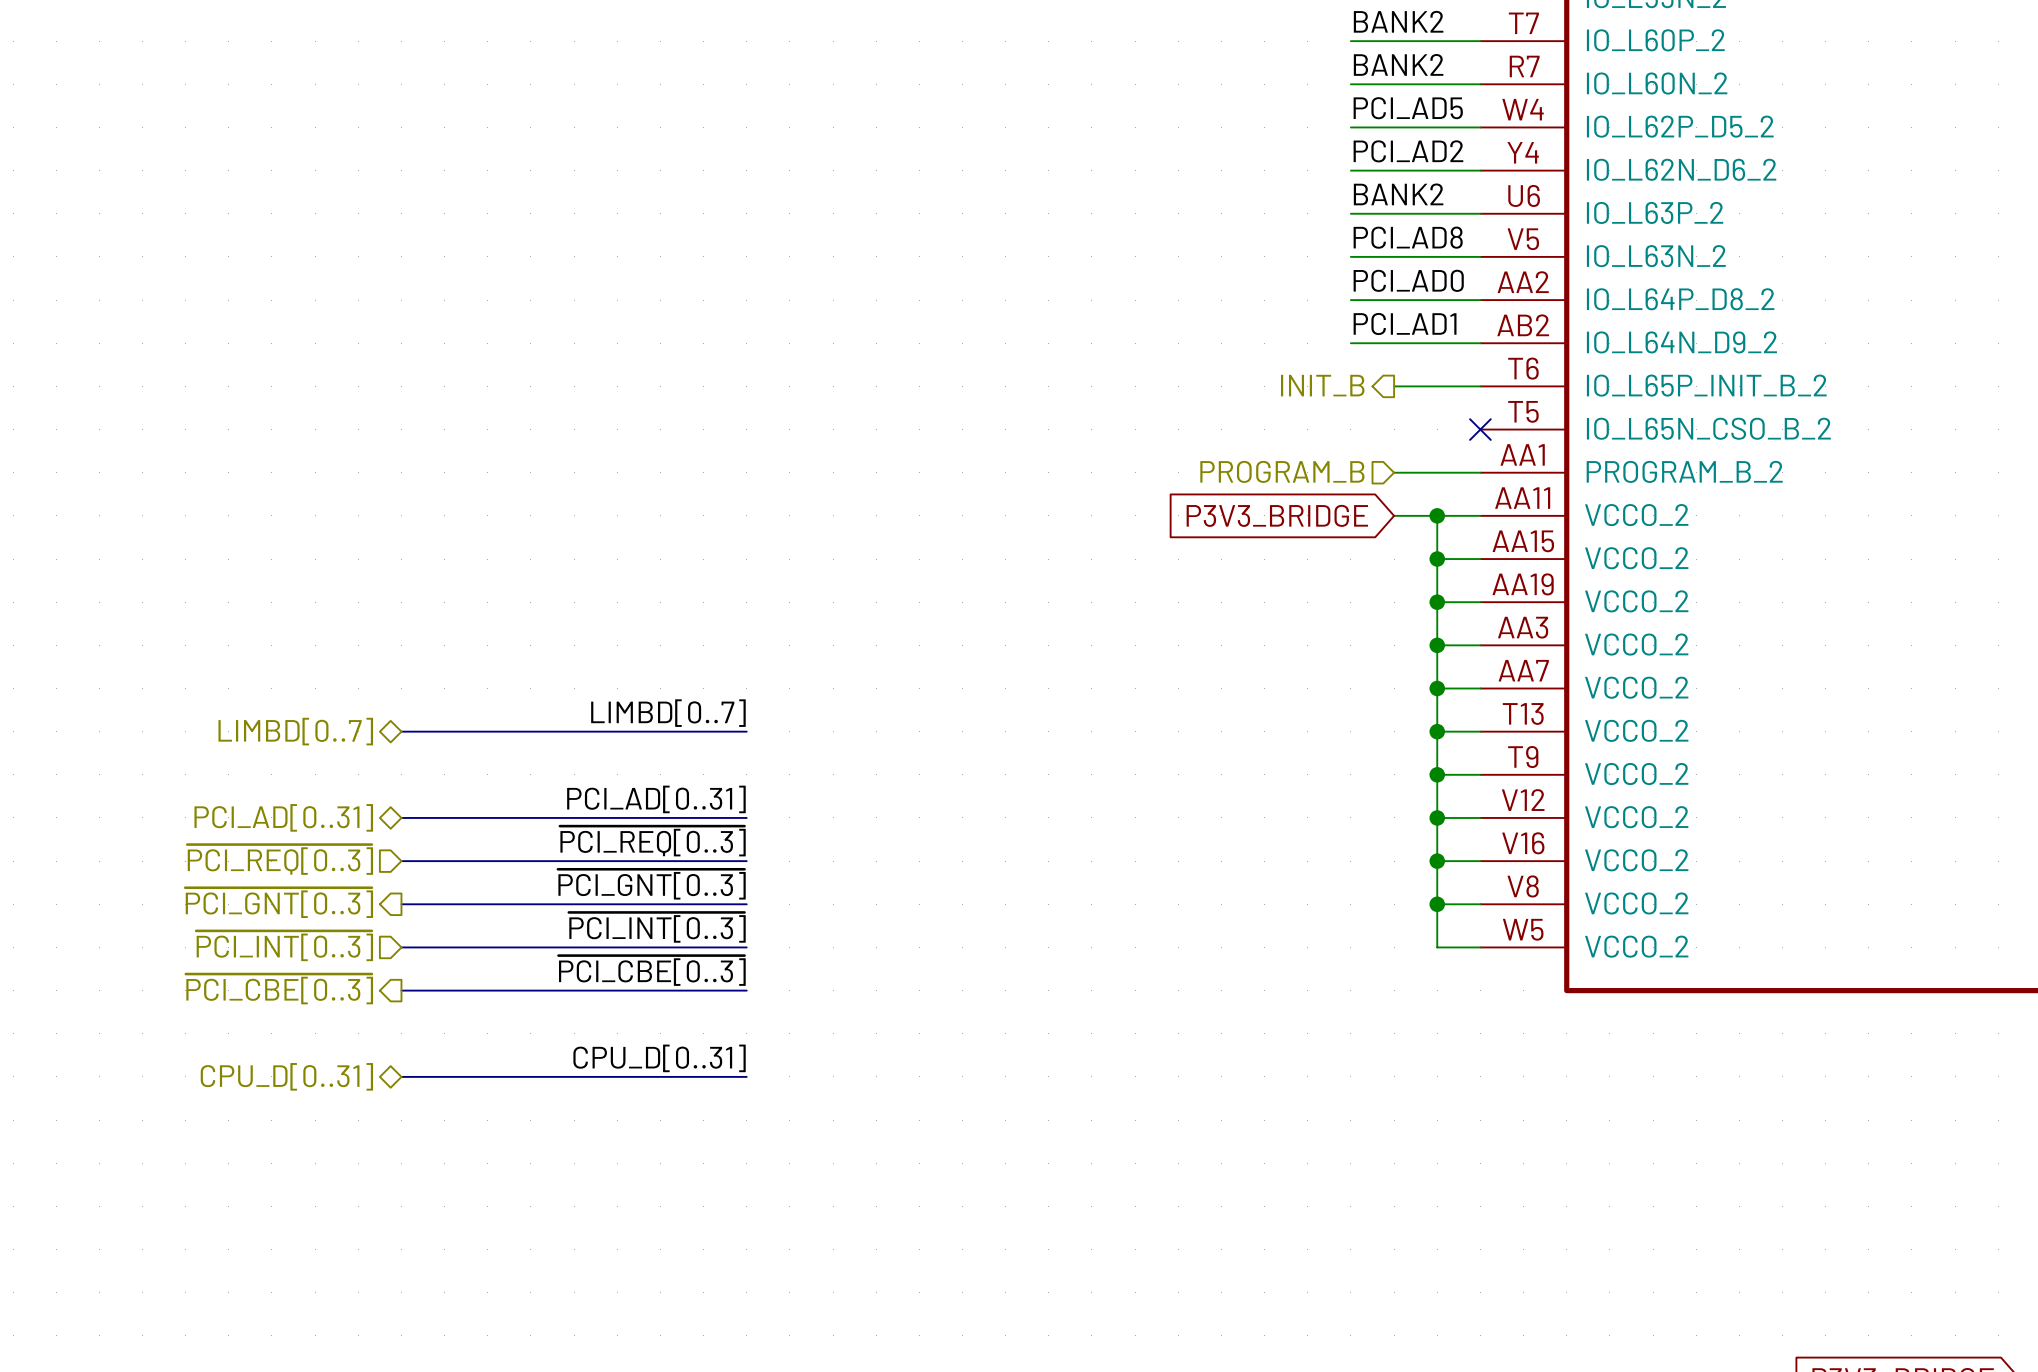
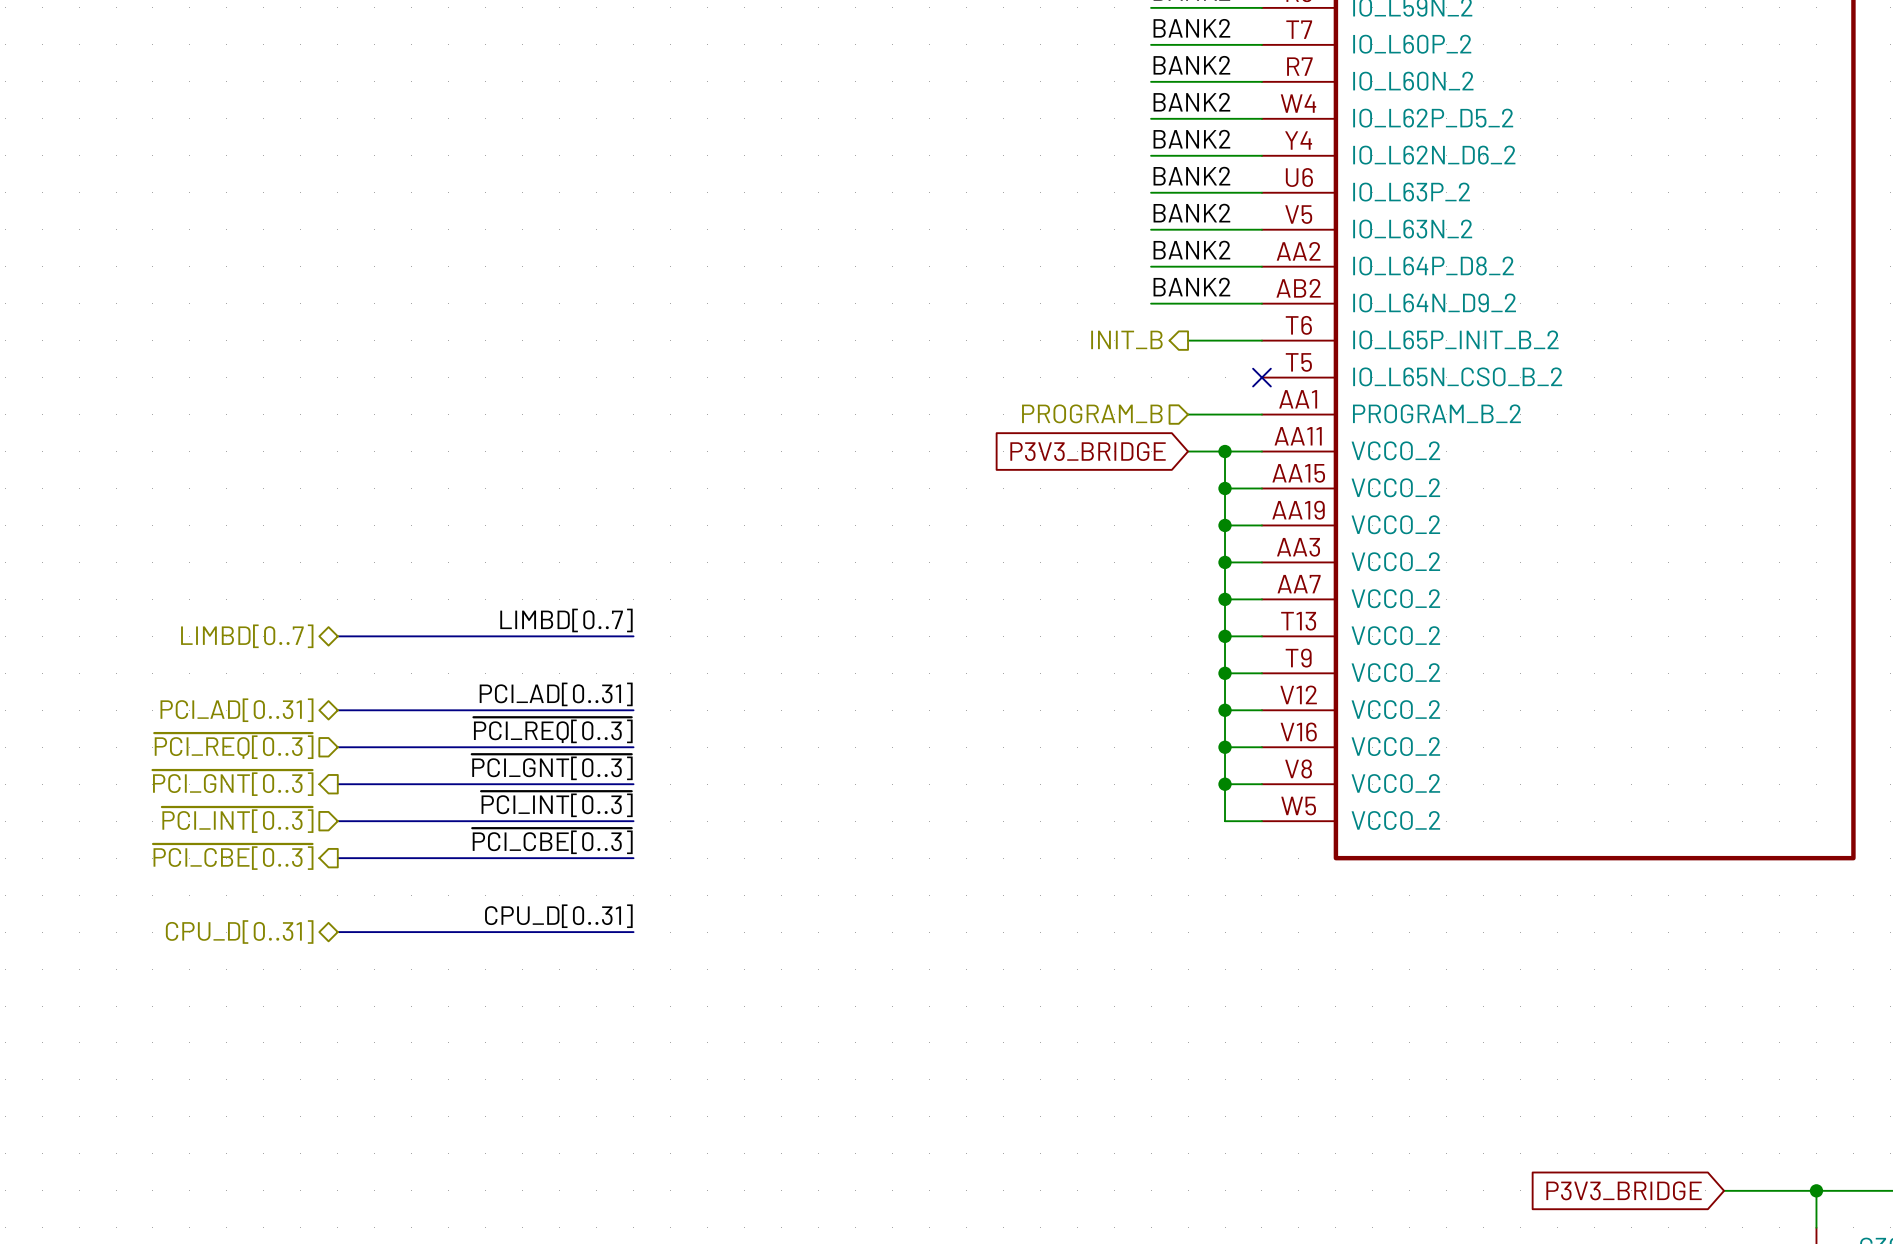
label: PCI_AD5 (1408, 108) -> BANK2 (1191, 102)
label: PCI_AD2 (1408, 151) -> BANK2 (1191, 139)
label: PCI_AD8 (1408, 237) -> BANK2 (1191, 213)
label: PCI_AD0 (1408, 280) -> BANK2 (1191, 250)
label: PCI_AD1 (1405, 324) -> BANK2 (1191, 287)

